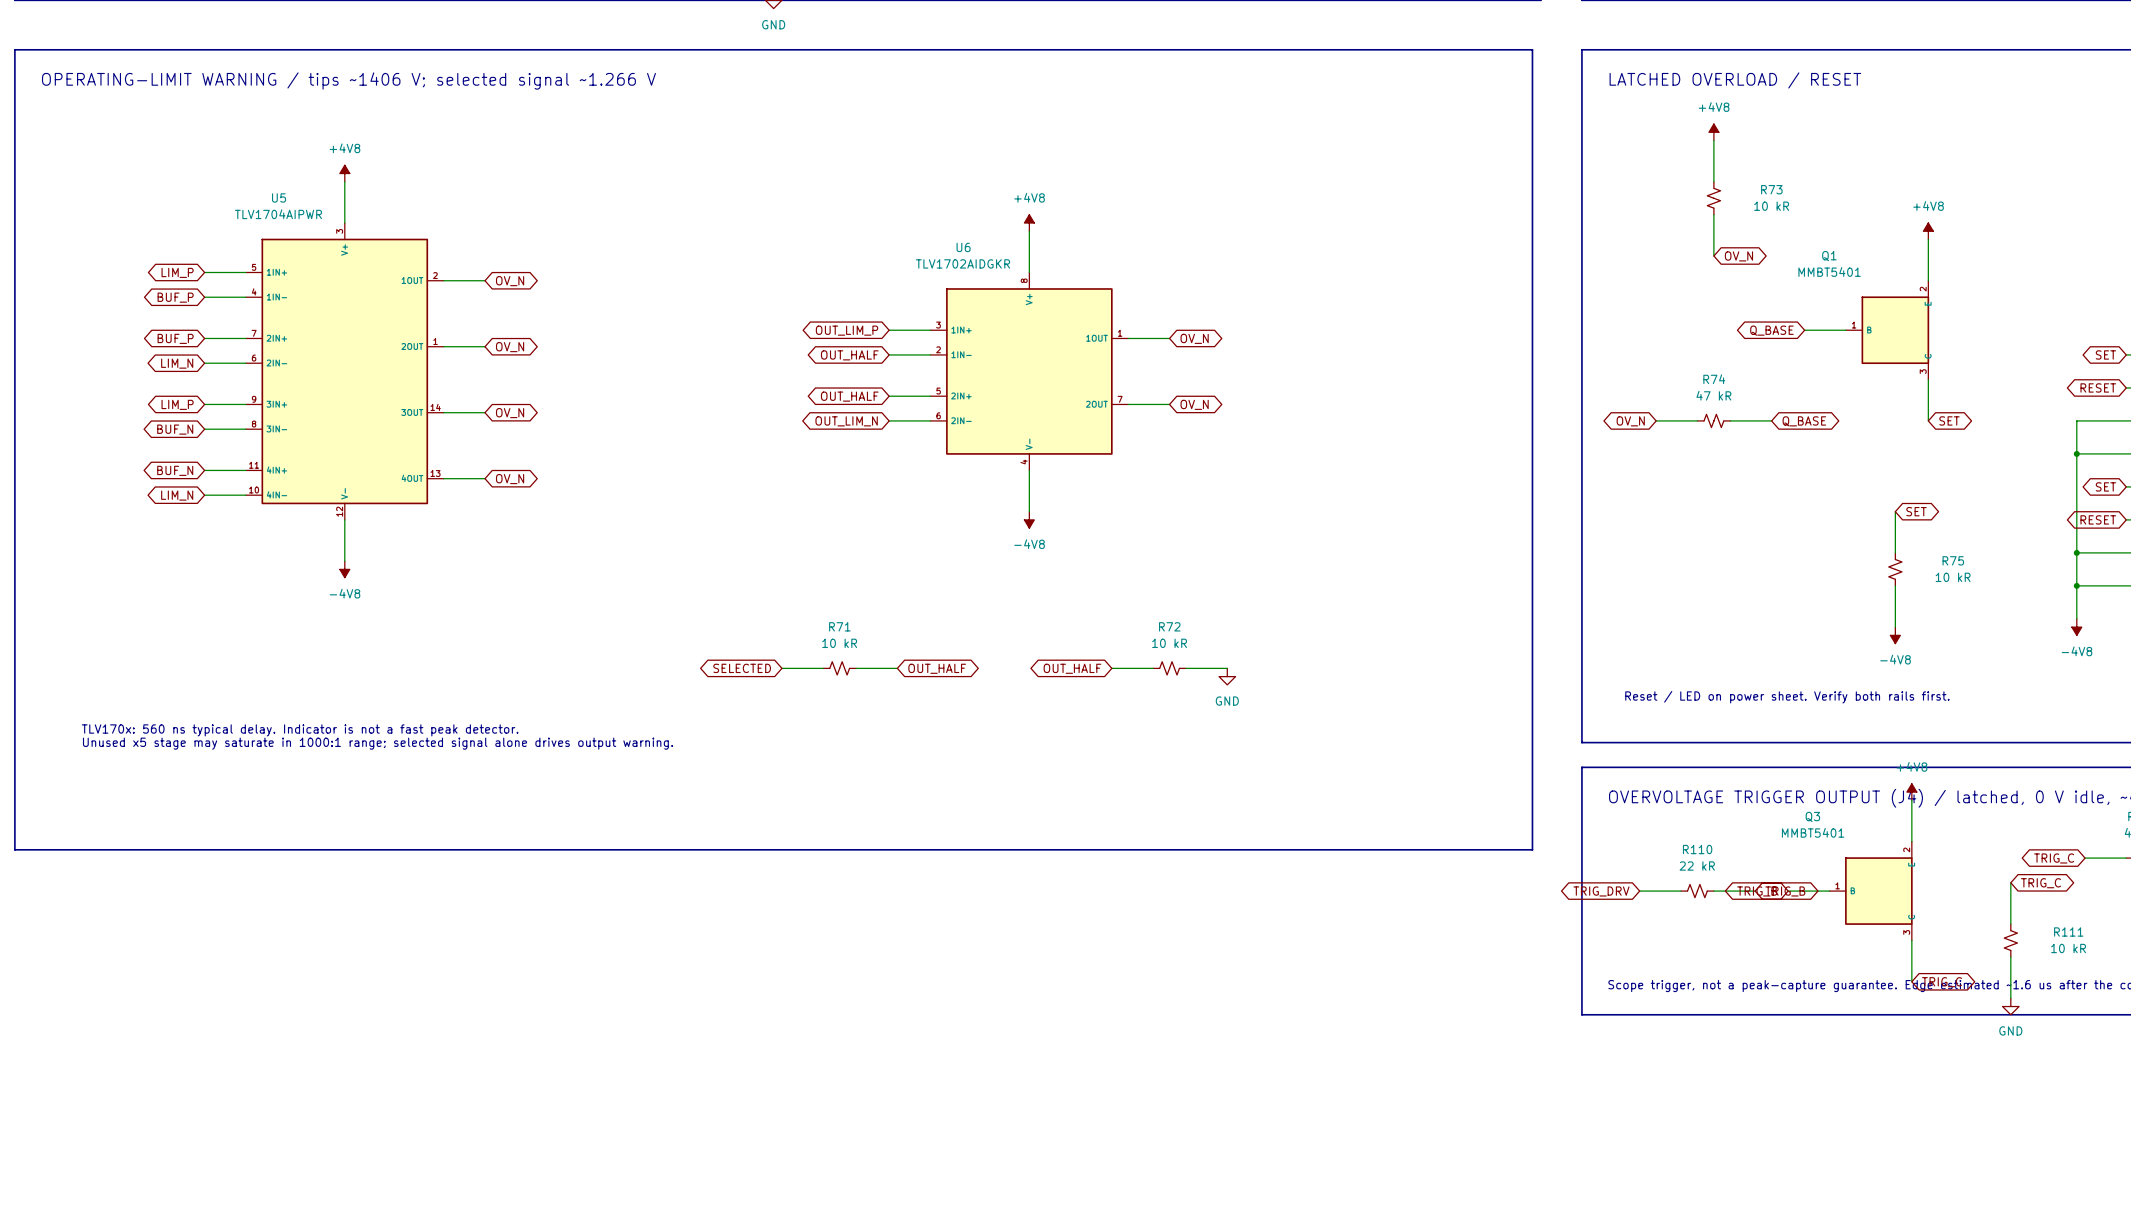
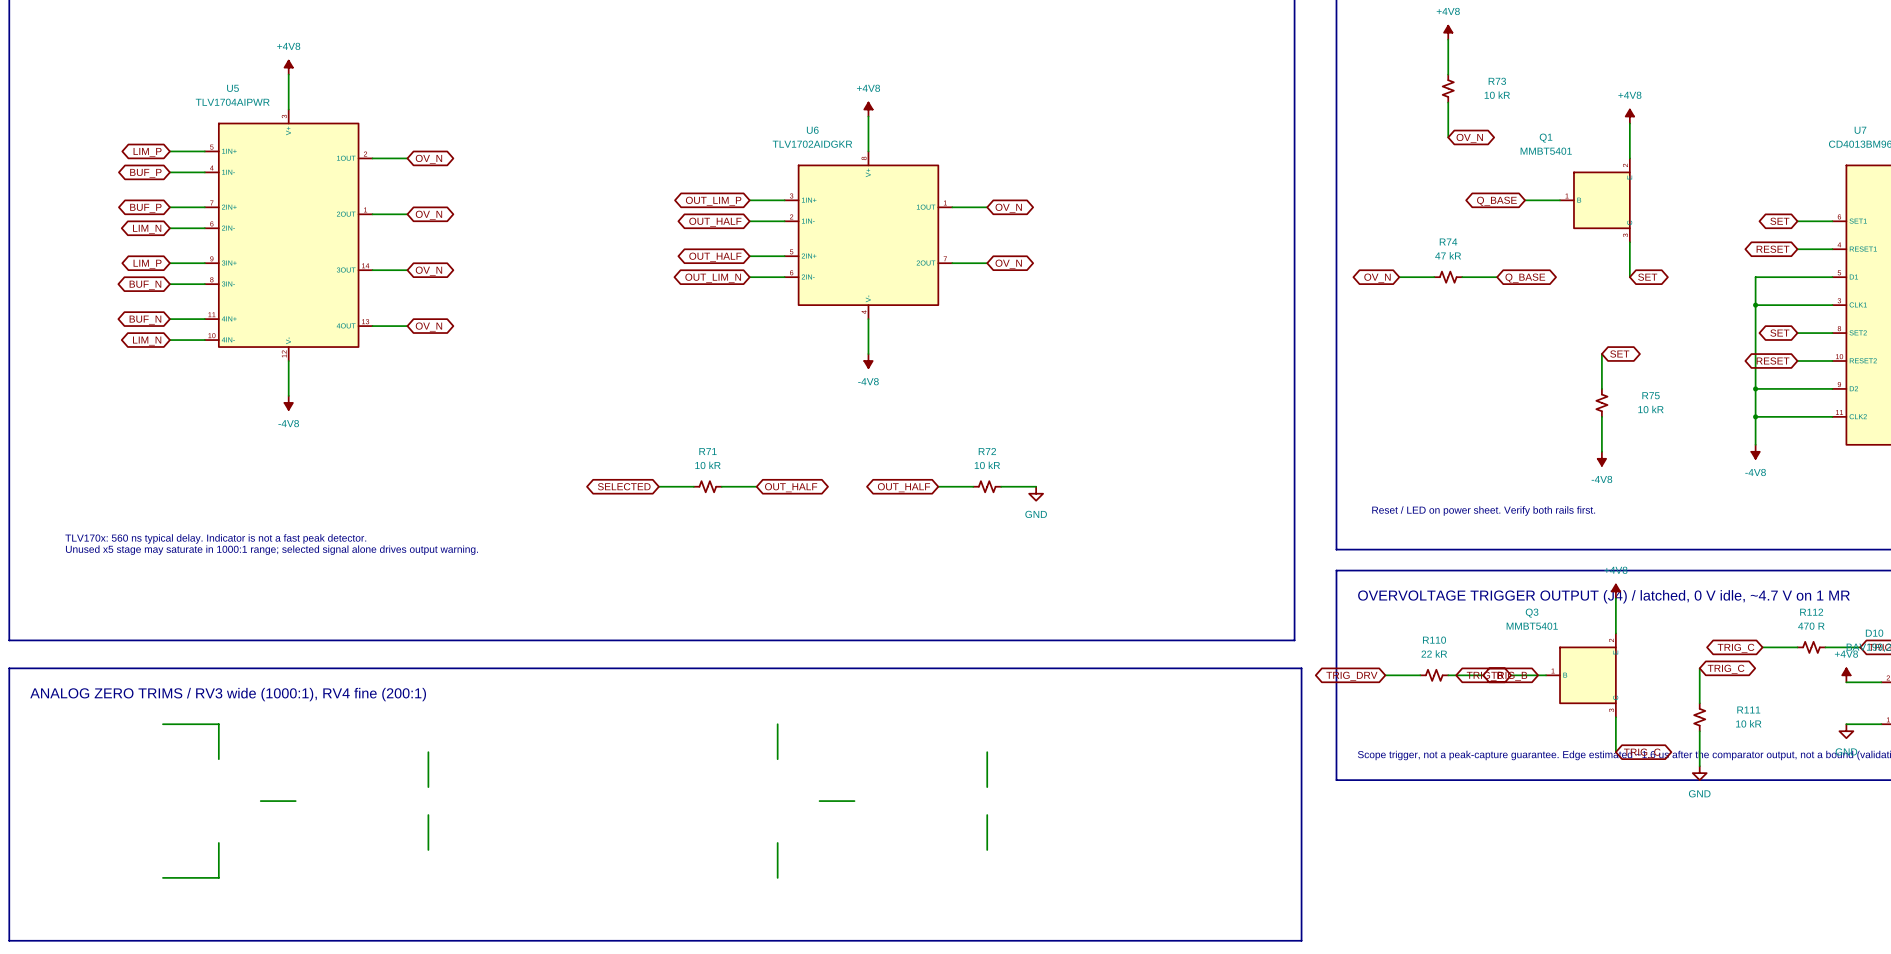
line: none -> (9, 668) (1301, 668) (1301, 940) (9, 940) (9, 668)
text: none -> ANALOG ZERO TRIMS / RV3 wide (1000:1), RV4 fine (200:1) (228, 694)
wire: none -> (162, 724) (218, 724) (218, 759)
wire: none -> (777, 724) (777, 759)
wire: none -> (428, 752) (428, 787)
wire: none -> (987, 752) (987, 787)
wire: none -> (260, 801) (295, 801)
wire: none -> (819, 801) (854, 801)
wire: none -> (428, 815) (428, 849)
wire: none -> (987, 815) (987, 849)
wire: none -> (218, 842) (218, 877) (162, 877)
wire: none -> (777, 842) (777, 877)

